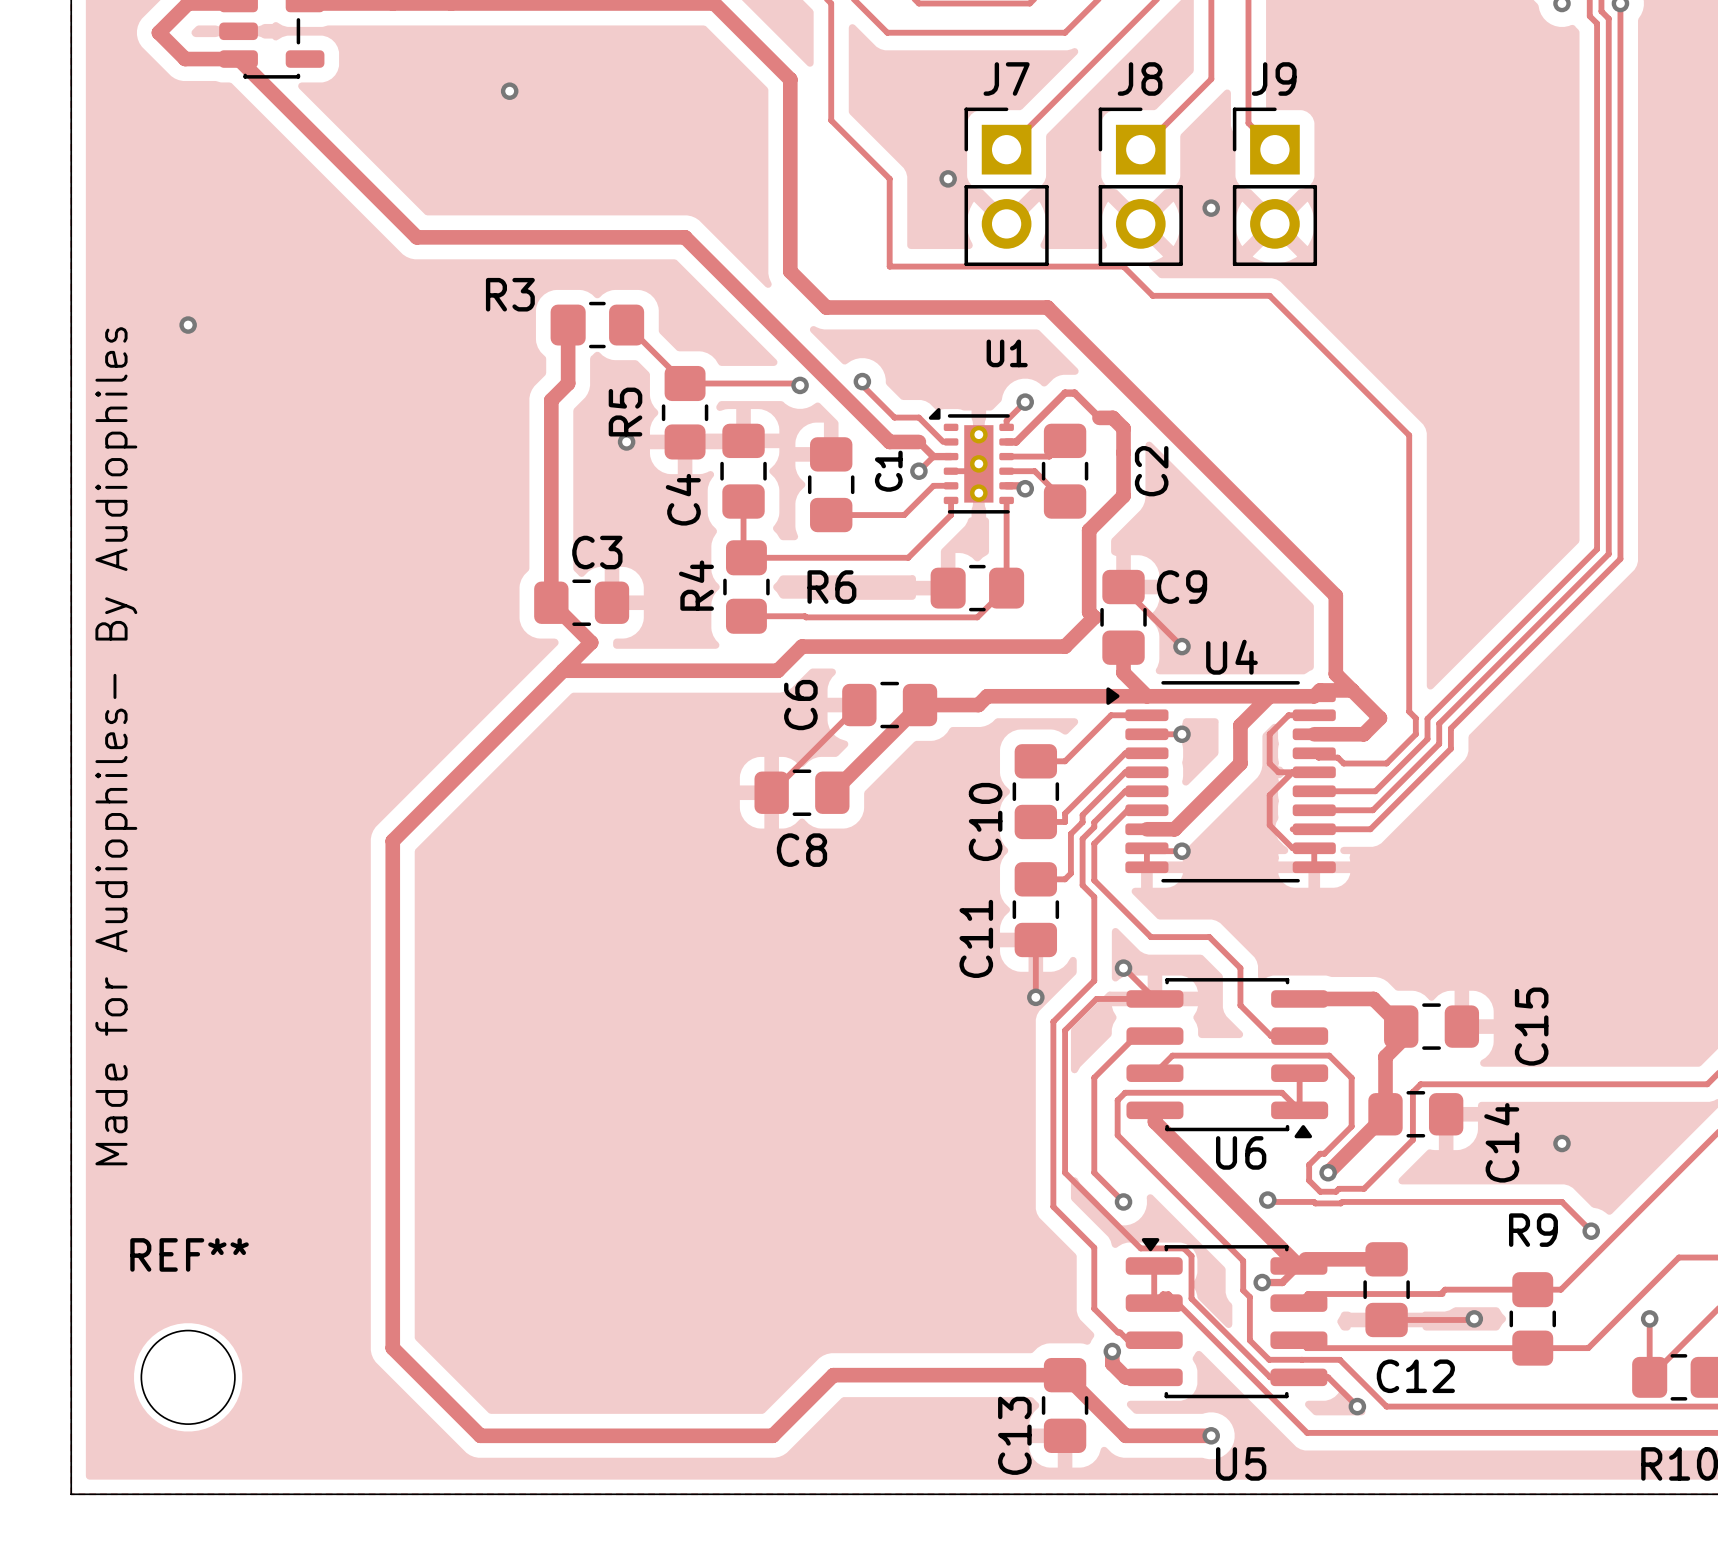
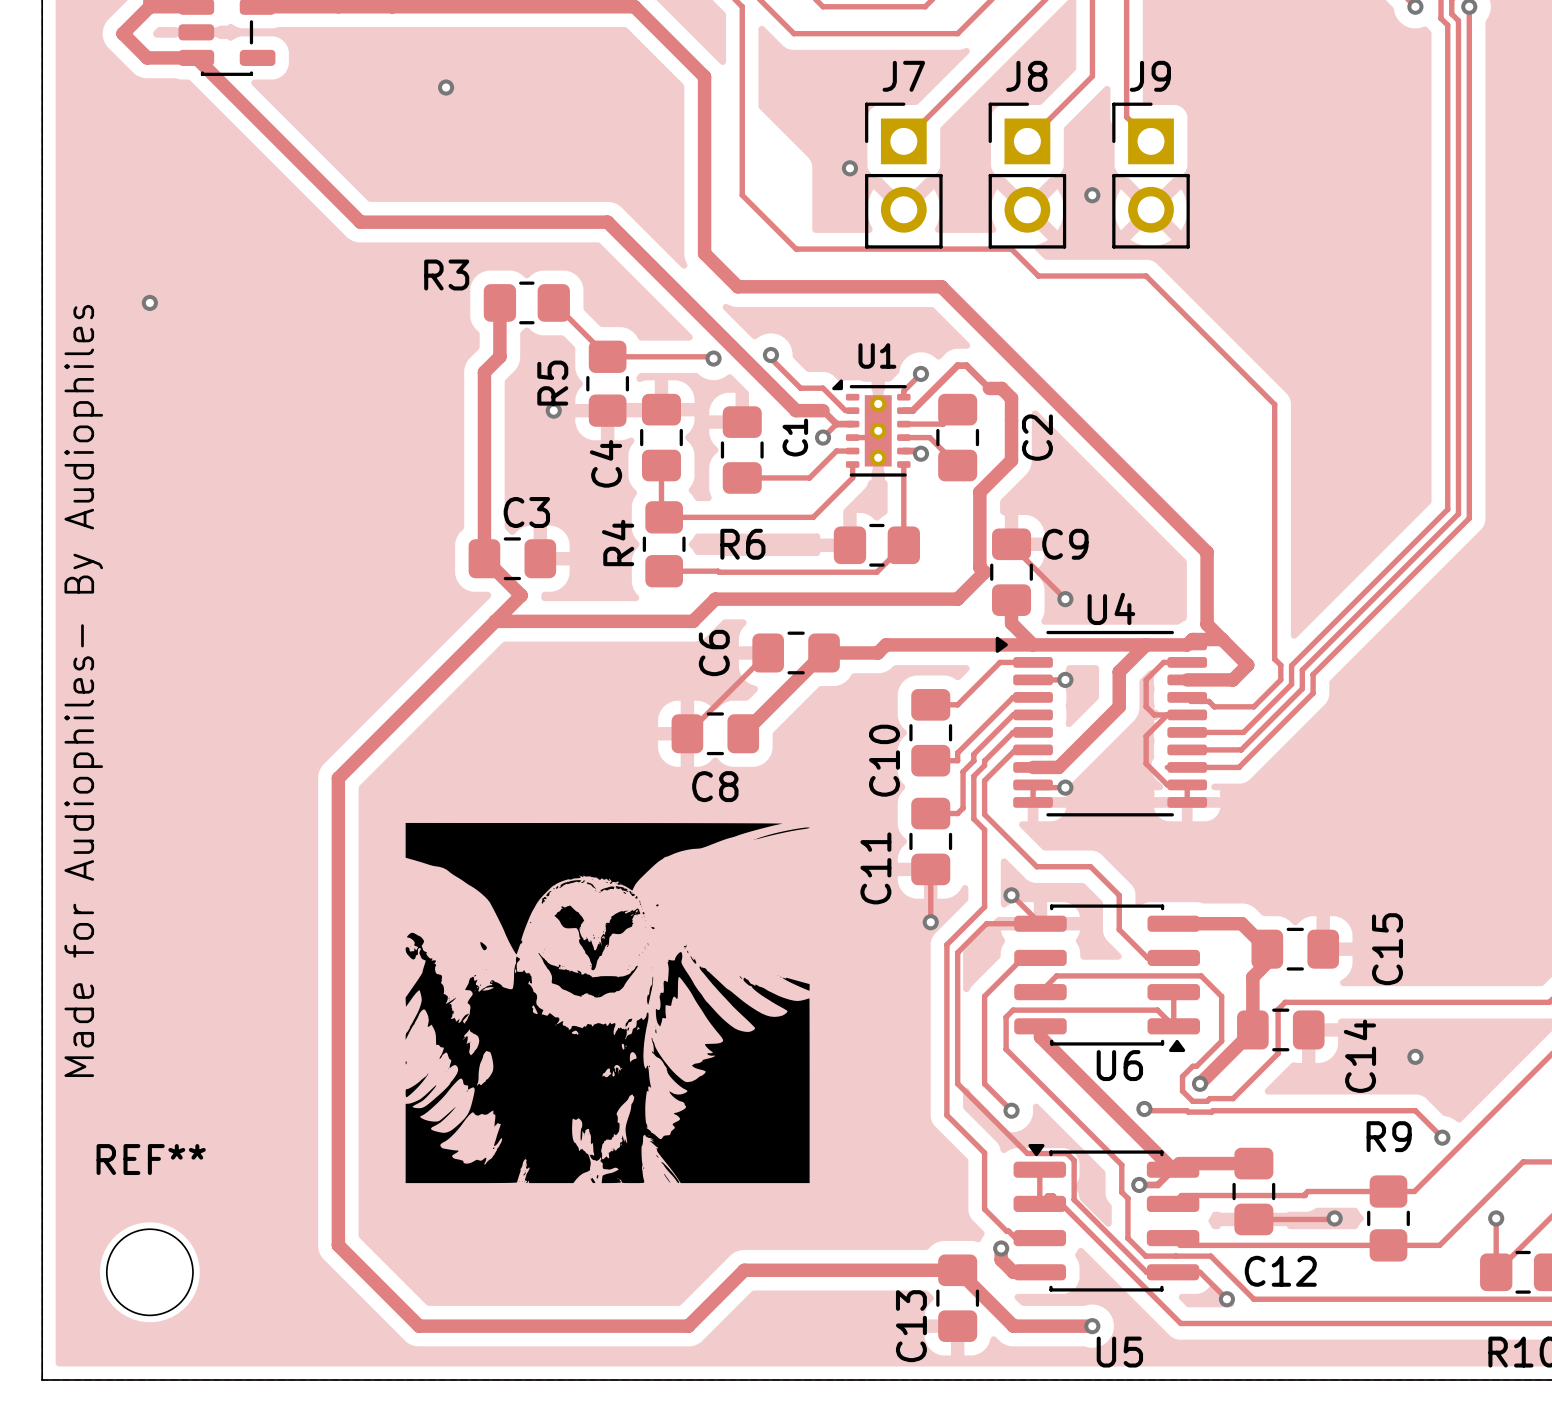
track: (831, 120) (889, 178) (889, 266) -> (742, 114) (742, 195) (796, 249)
U1 name position: U1 (1007, 353) -> U1 (877, 355)
drawing: none -> [405, 822, 810, 1184]

